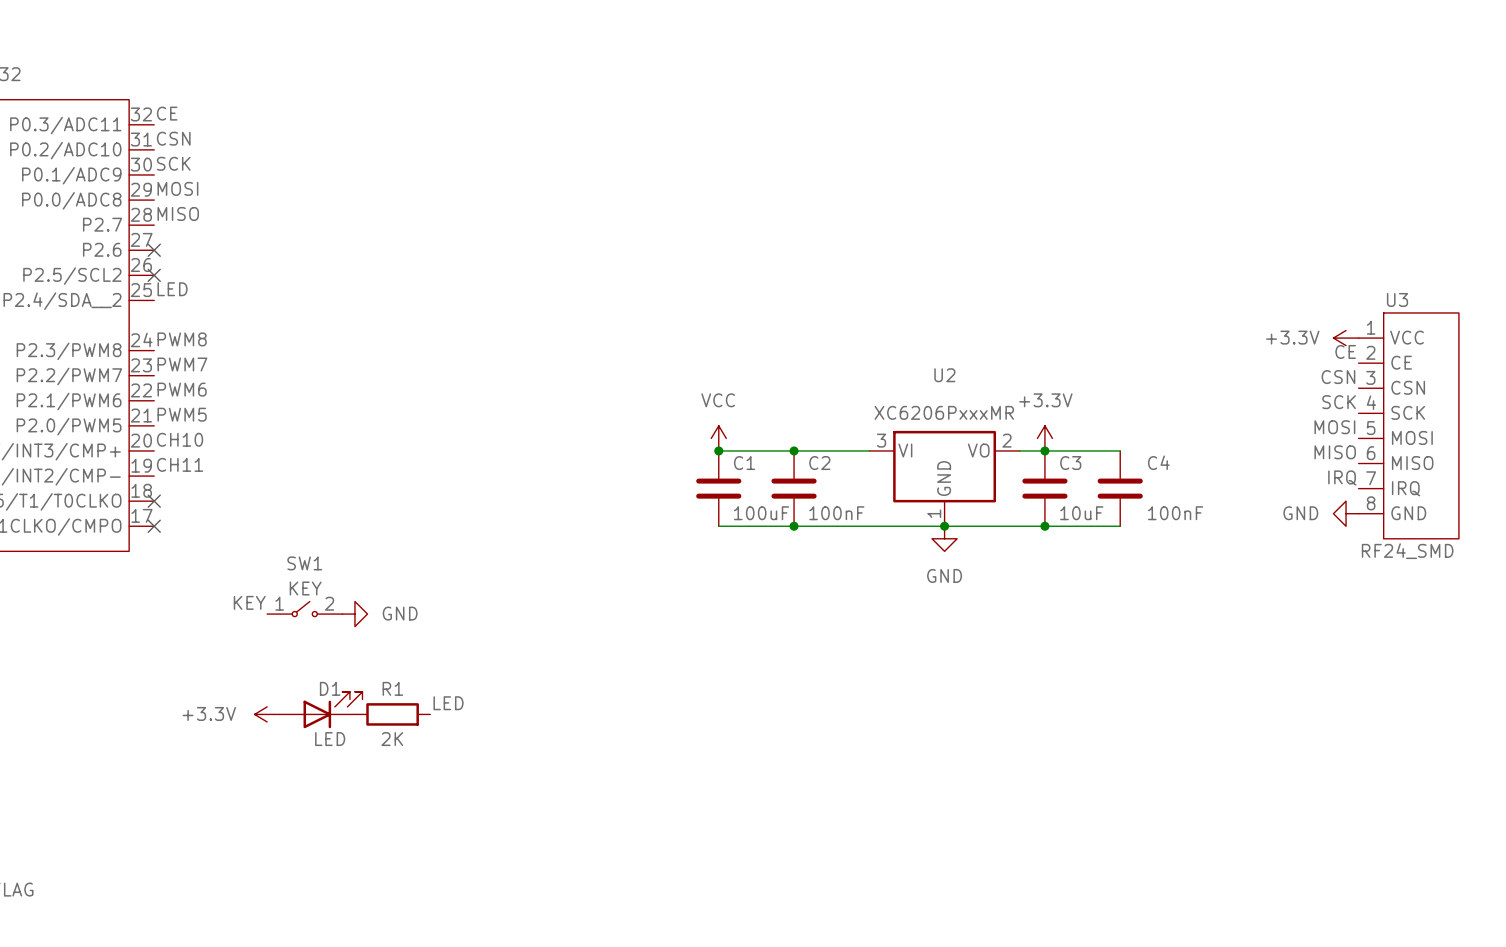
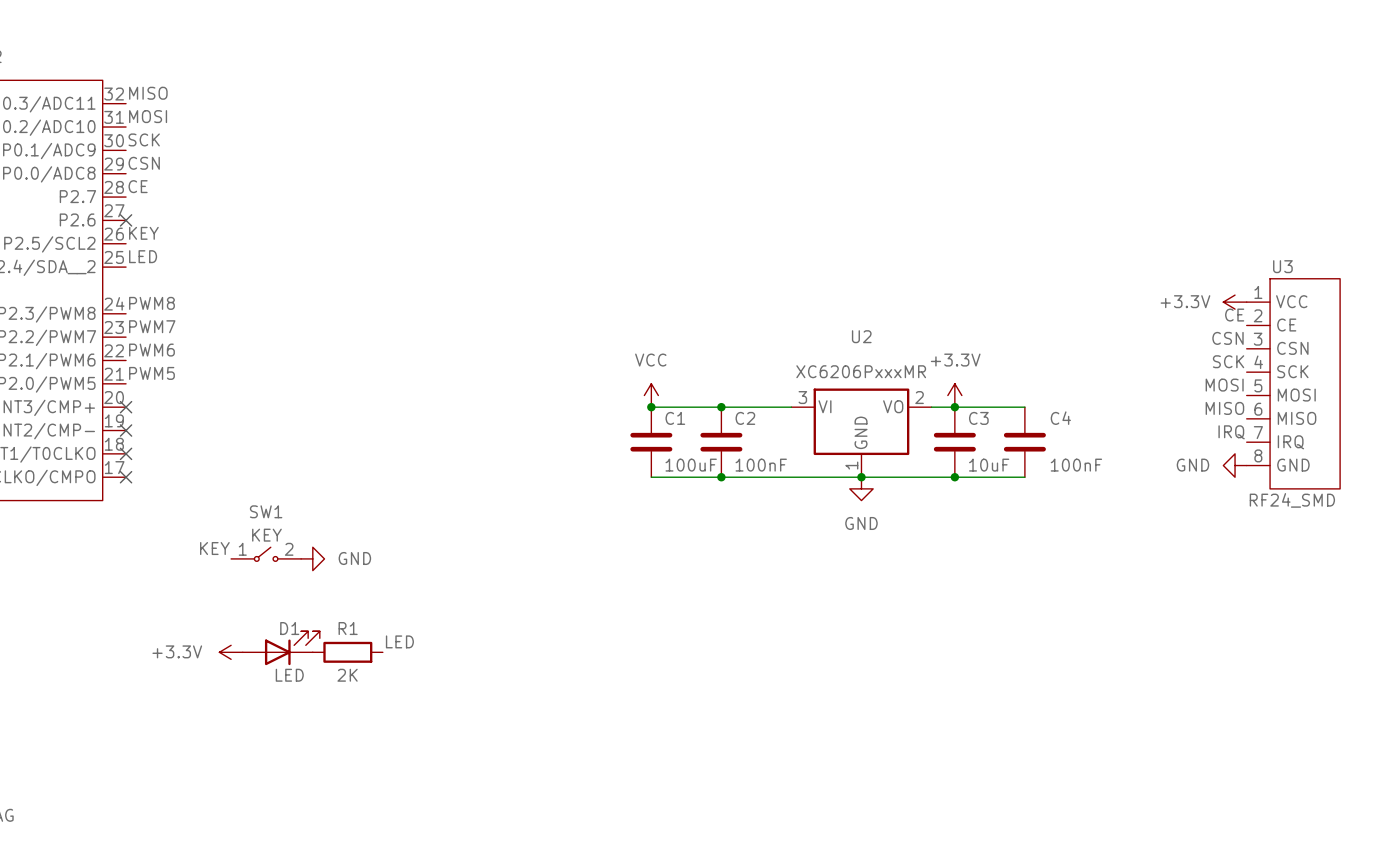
label: CE (167, 113) -> MISO (148, 93)
label: CSN (173, 138) -> MOSI (148, 116)
label: MOSI (177, 188) -> CSN (144, 163)
label: MISO (178, 213) -> CE (138, 186)
label: none -> KEY (143, 233)
no-connect mark: (154, 275) -> none
label: CH10 (180, 439) -> none
no-connect mark: none -> (126, 407)
label: CH11 (180, 464) -> none
no-connect mark: none -> (126, 430)

